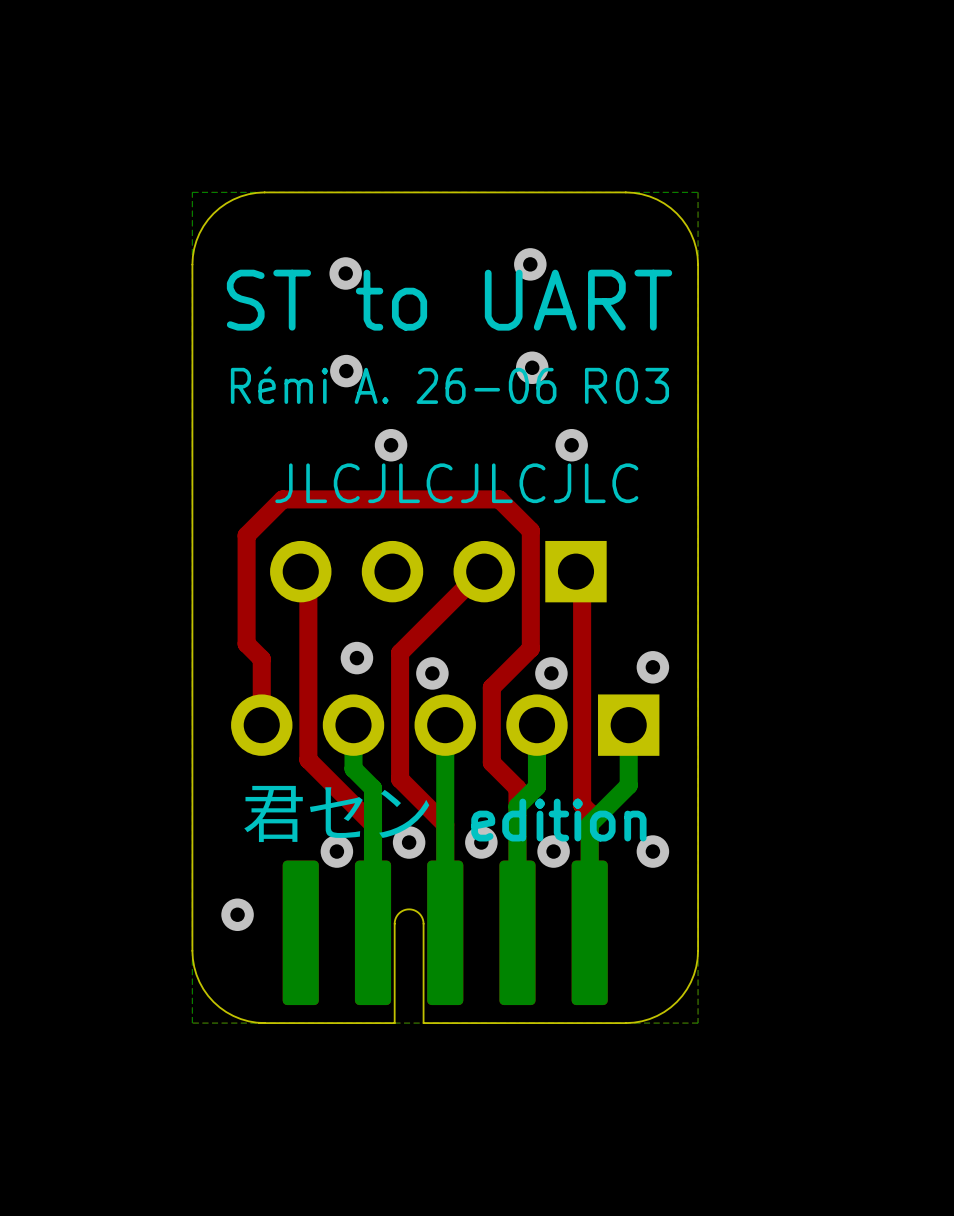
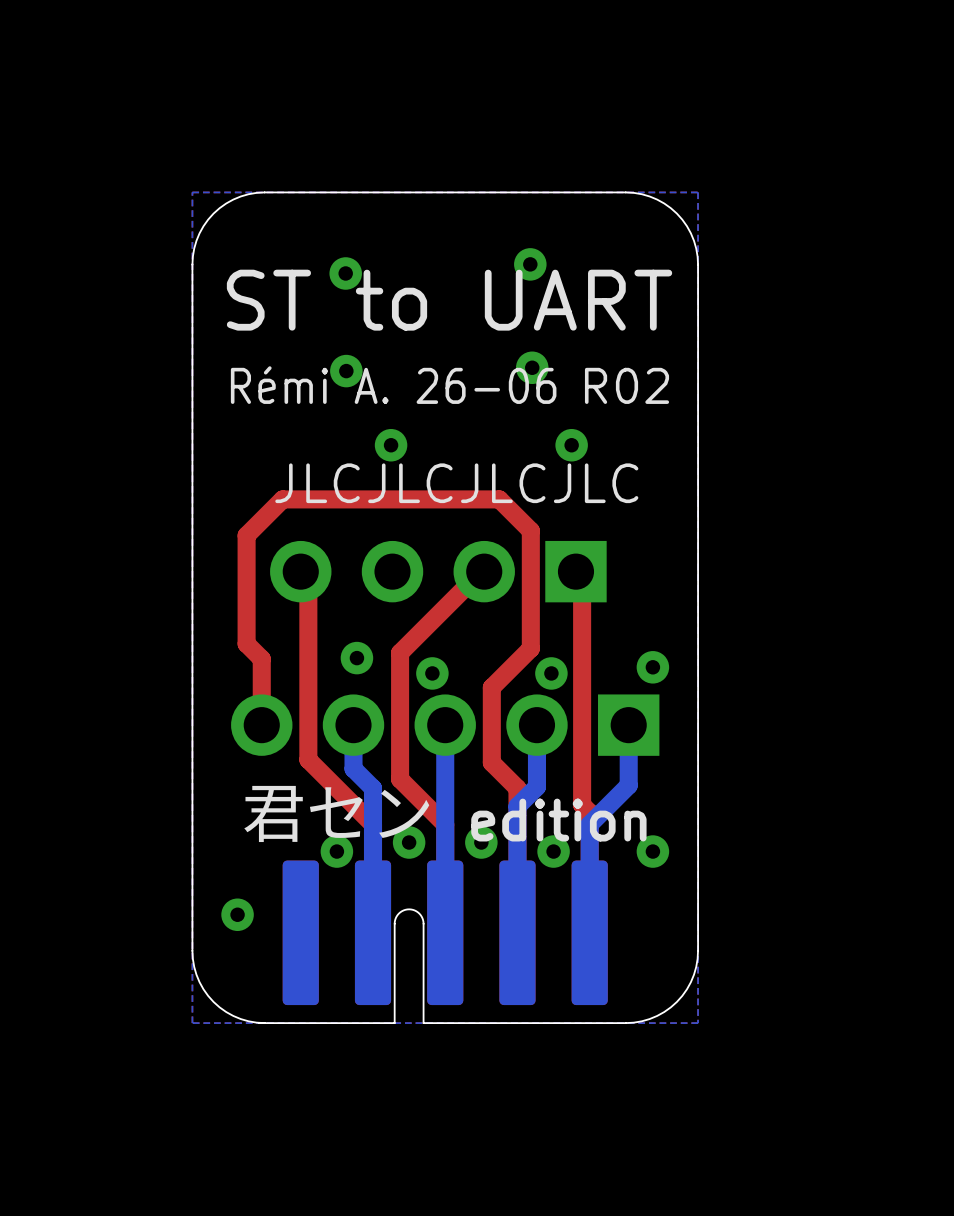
text: R03 (627, 385) -> R02 (627, 385)

